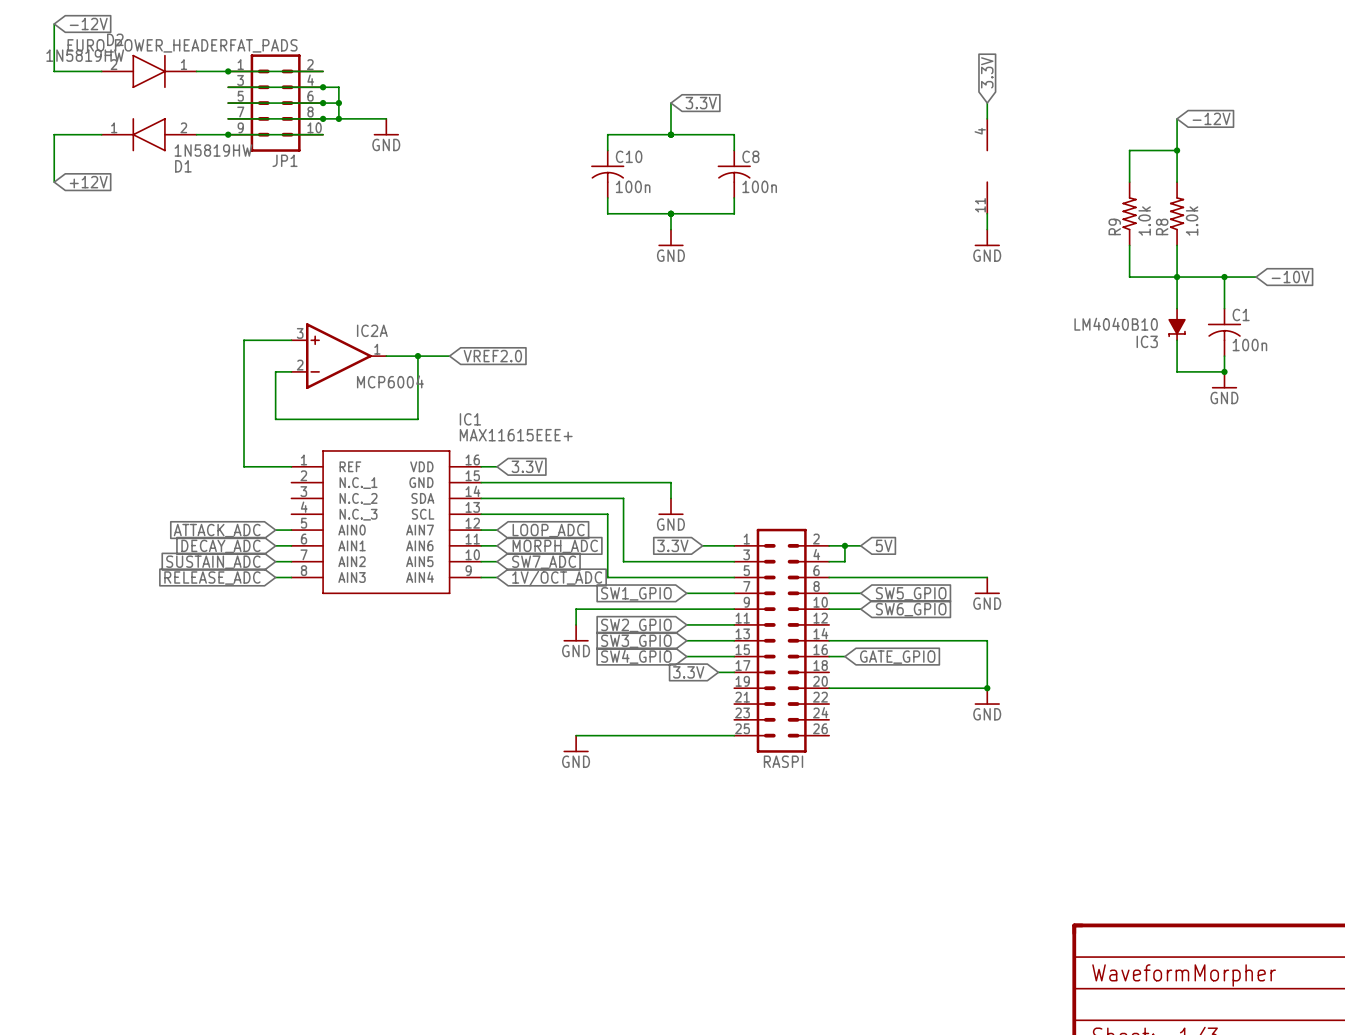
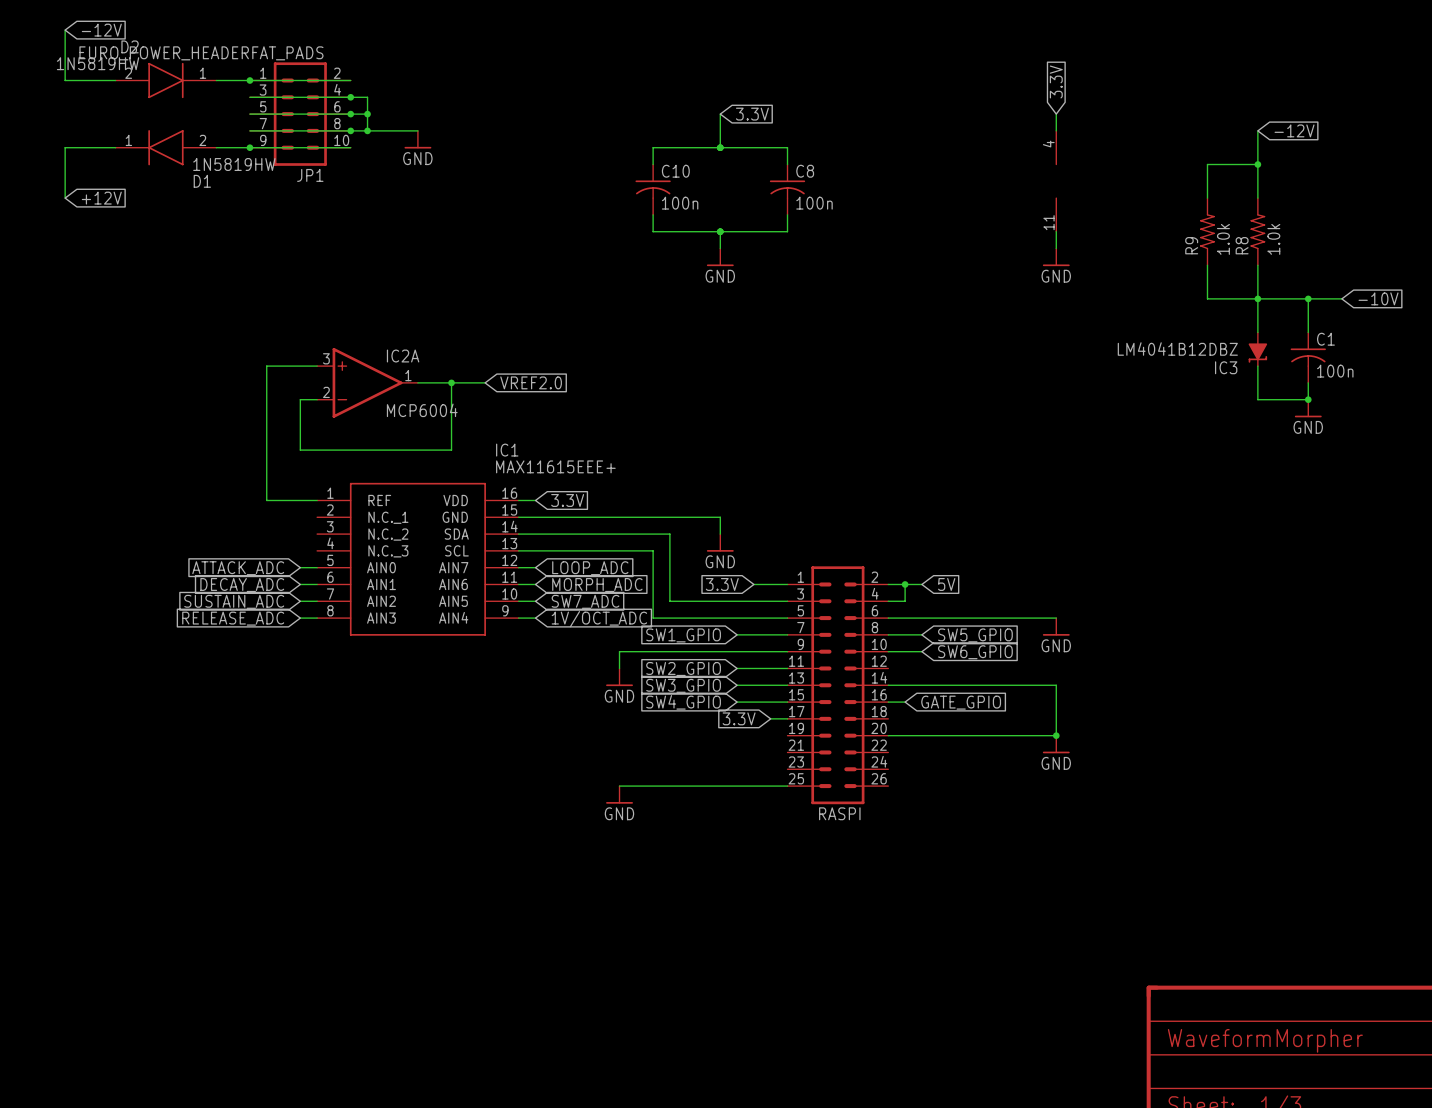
IC3 value: LM4040B10 (1116, 324) -> LM4041B12DBZ (1177, 349)

